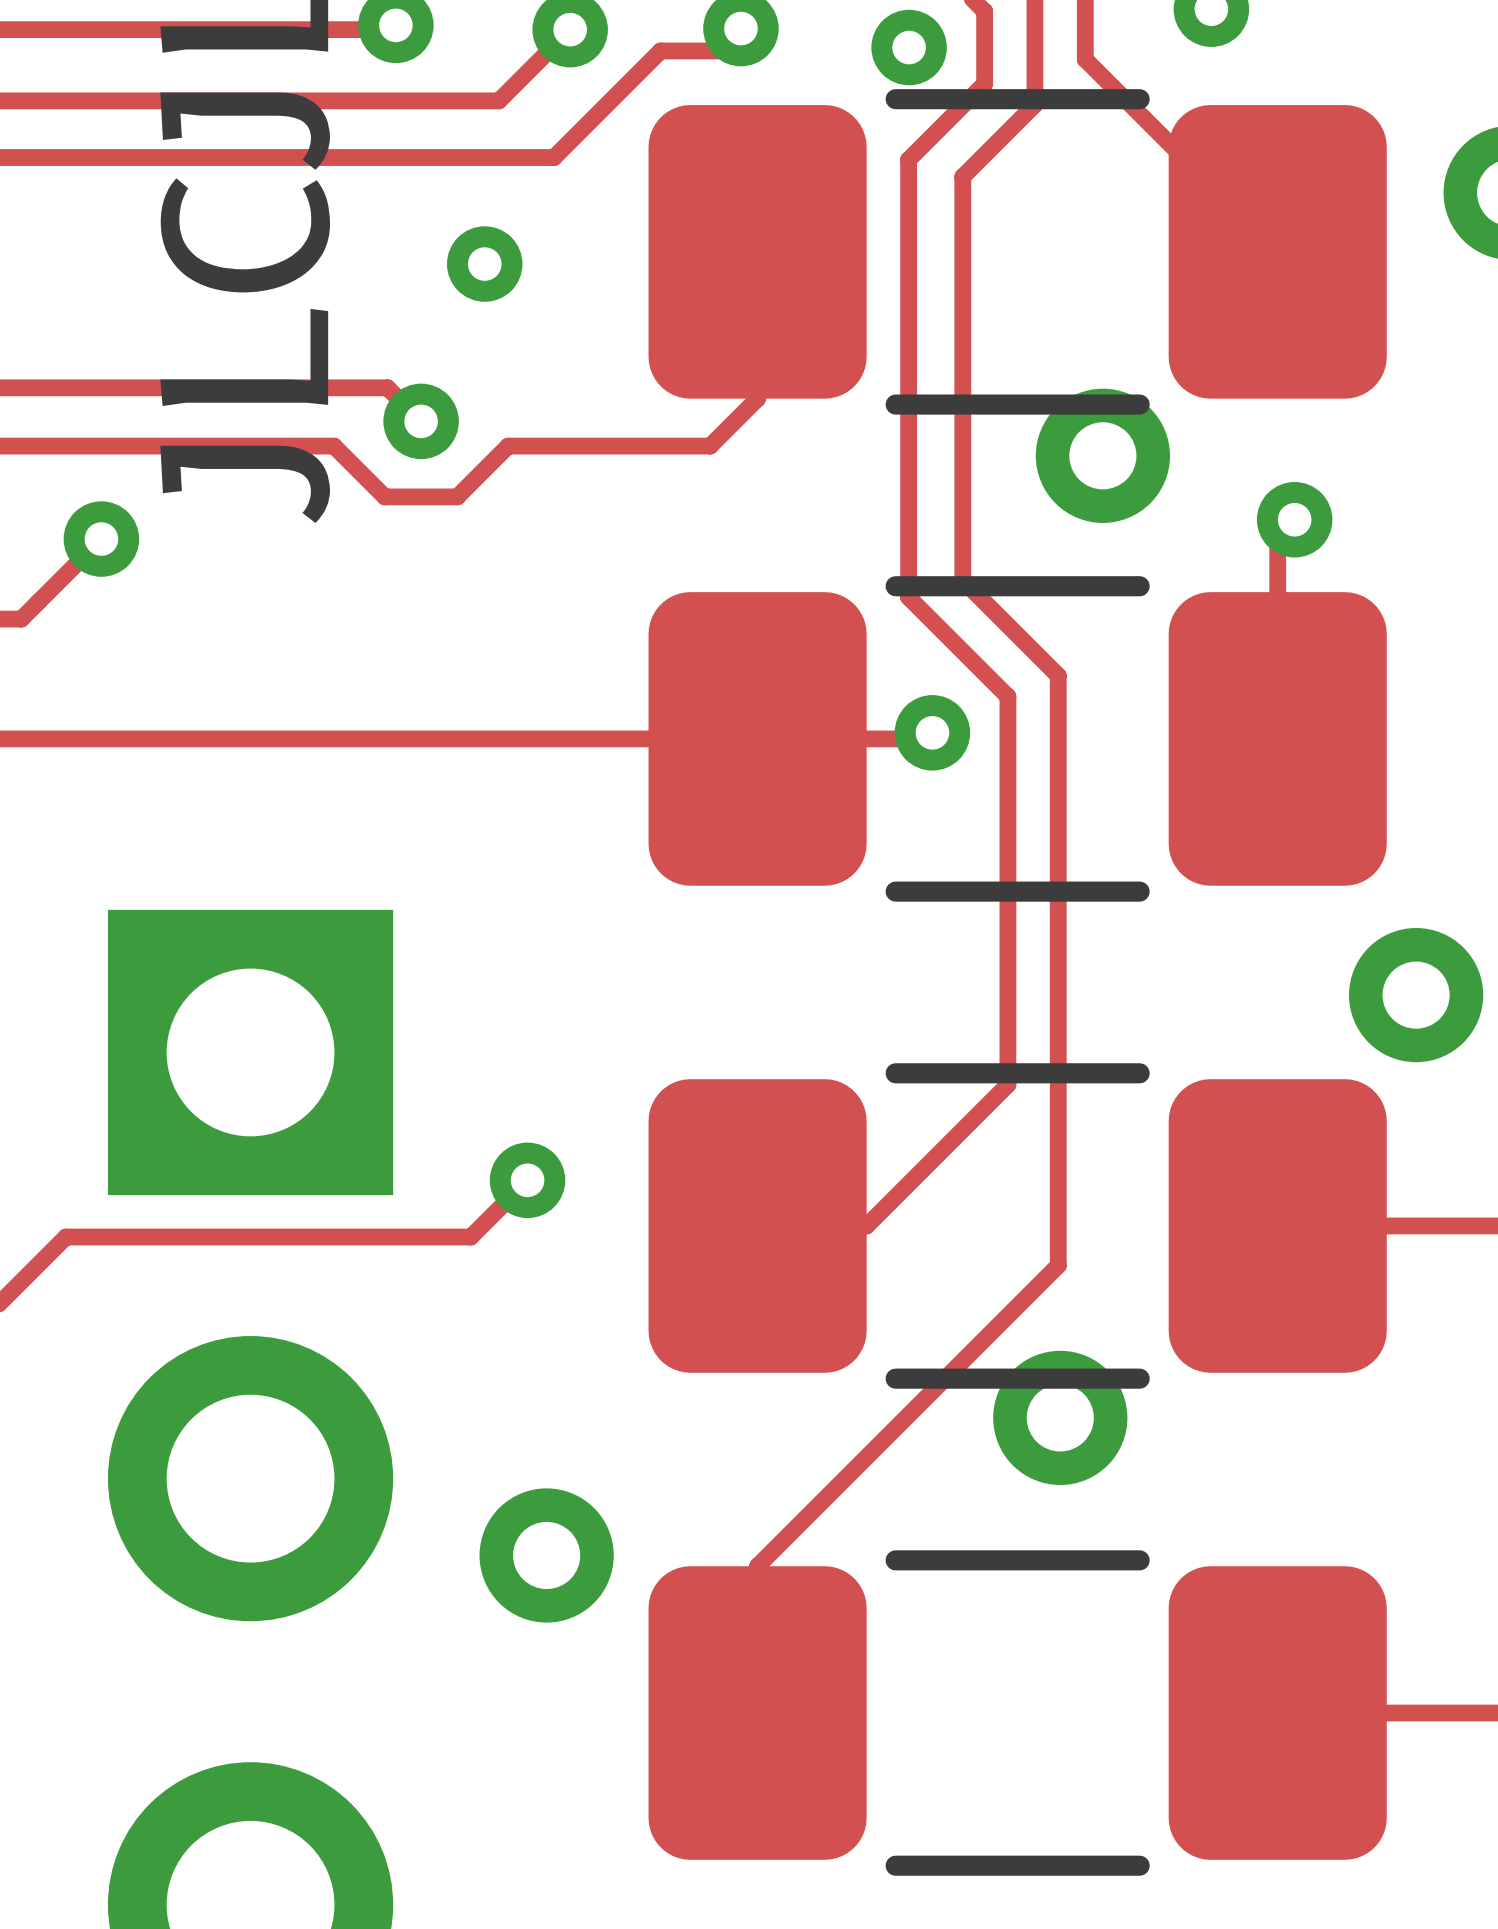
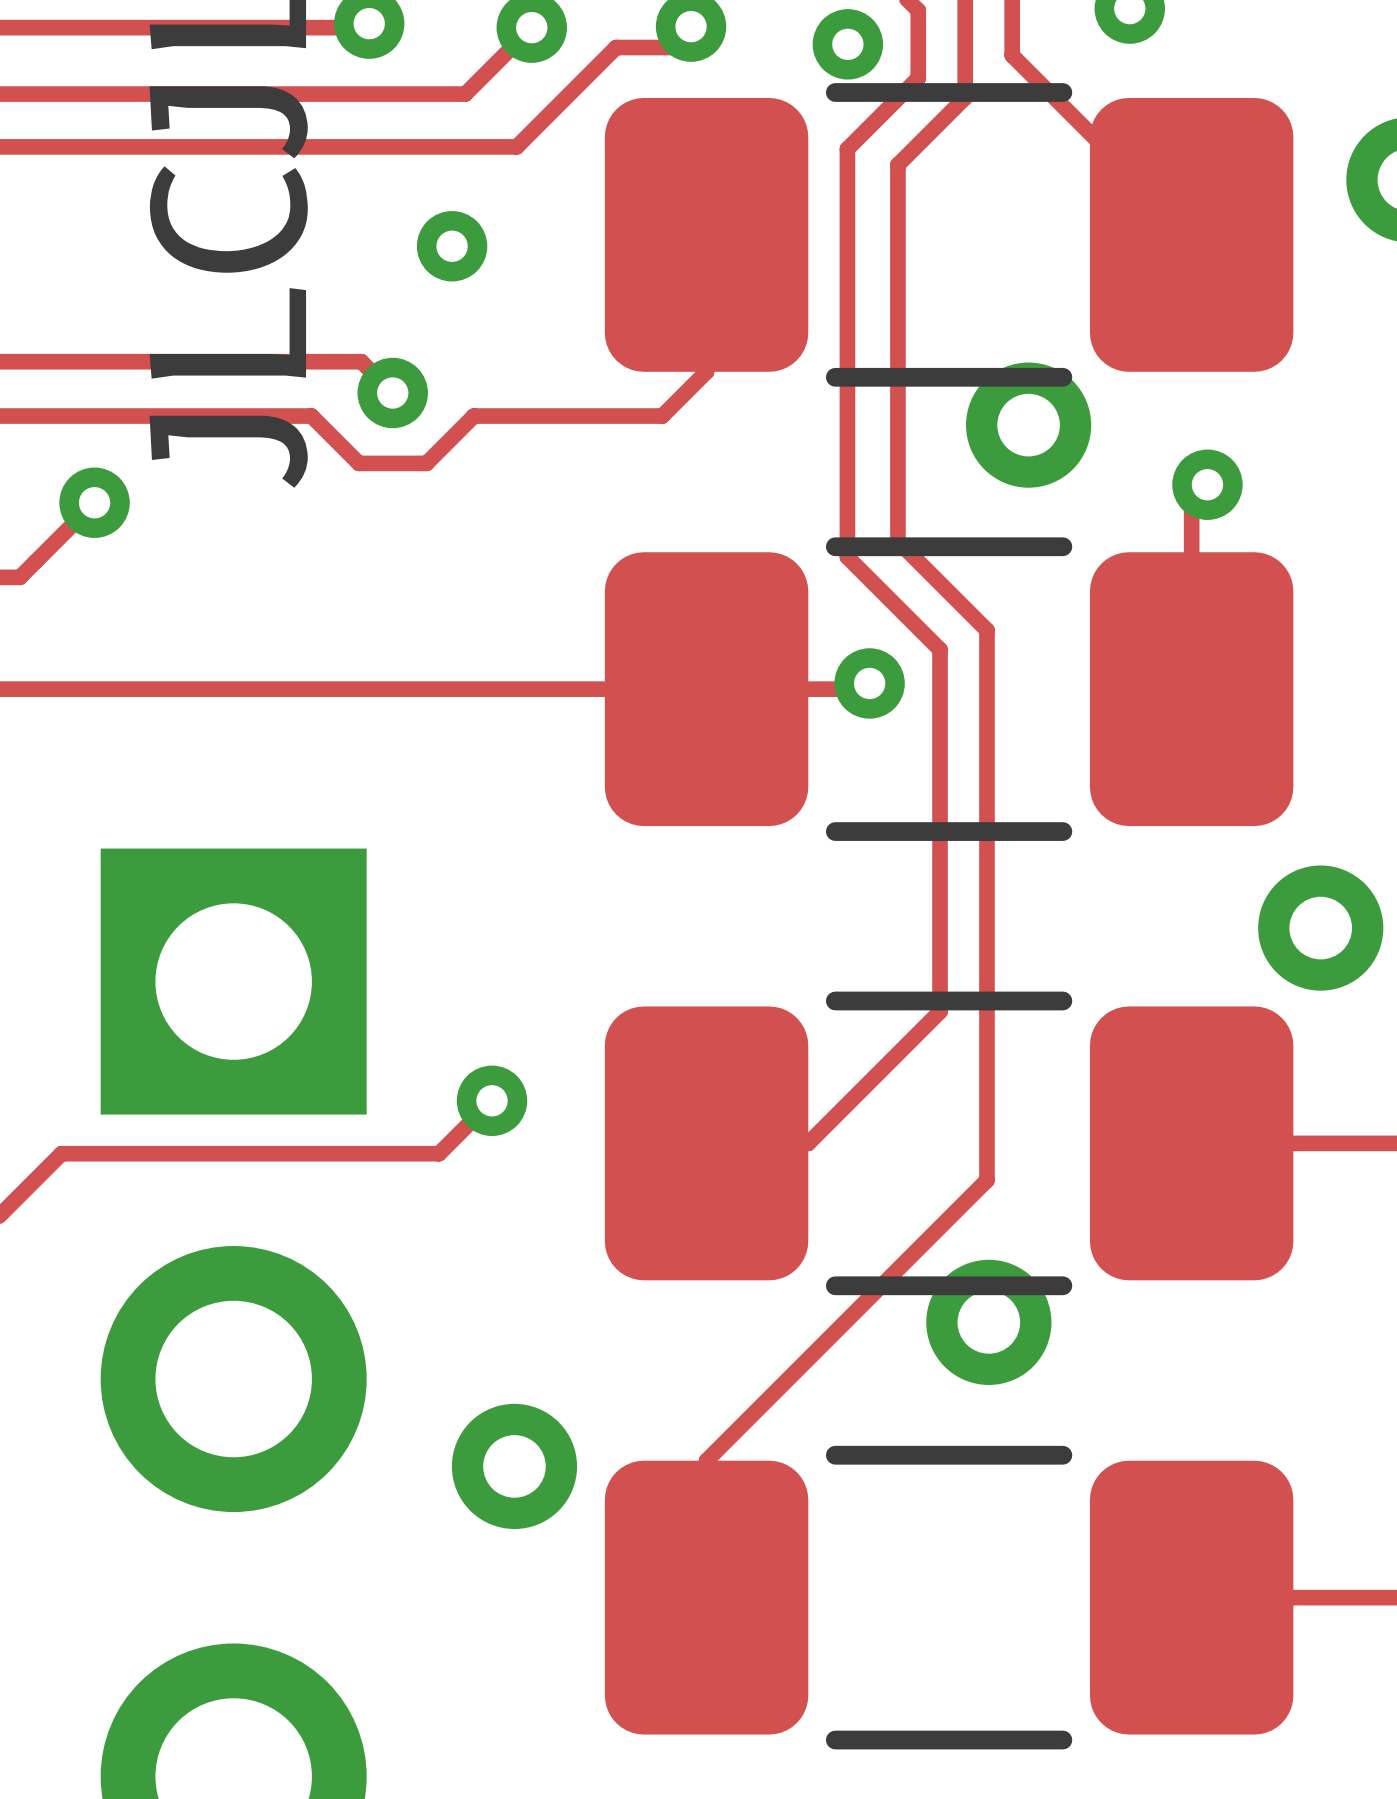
via position: (546, 1555) -> (514, 1466)

